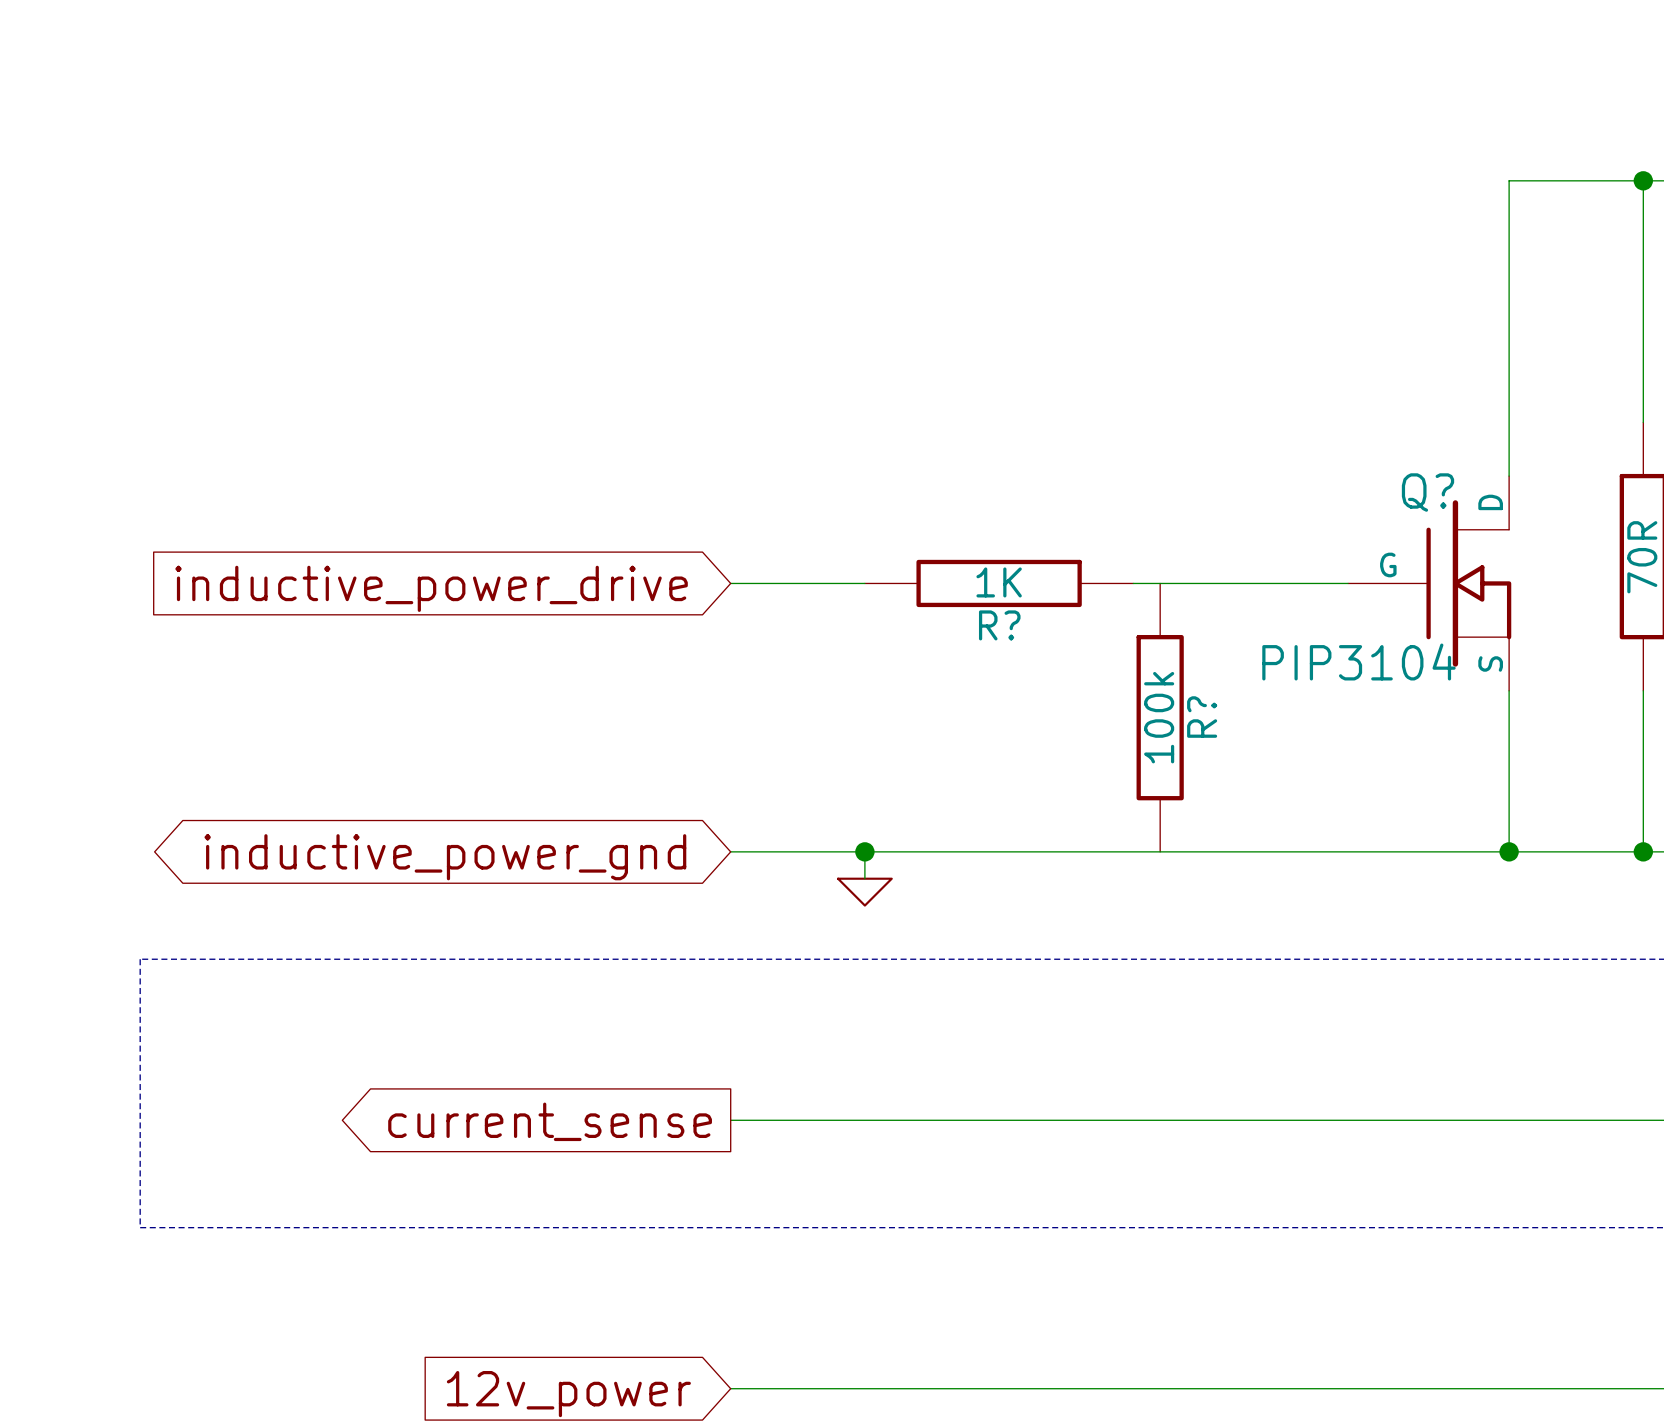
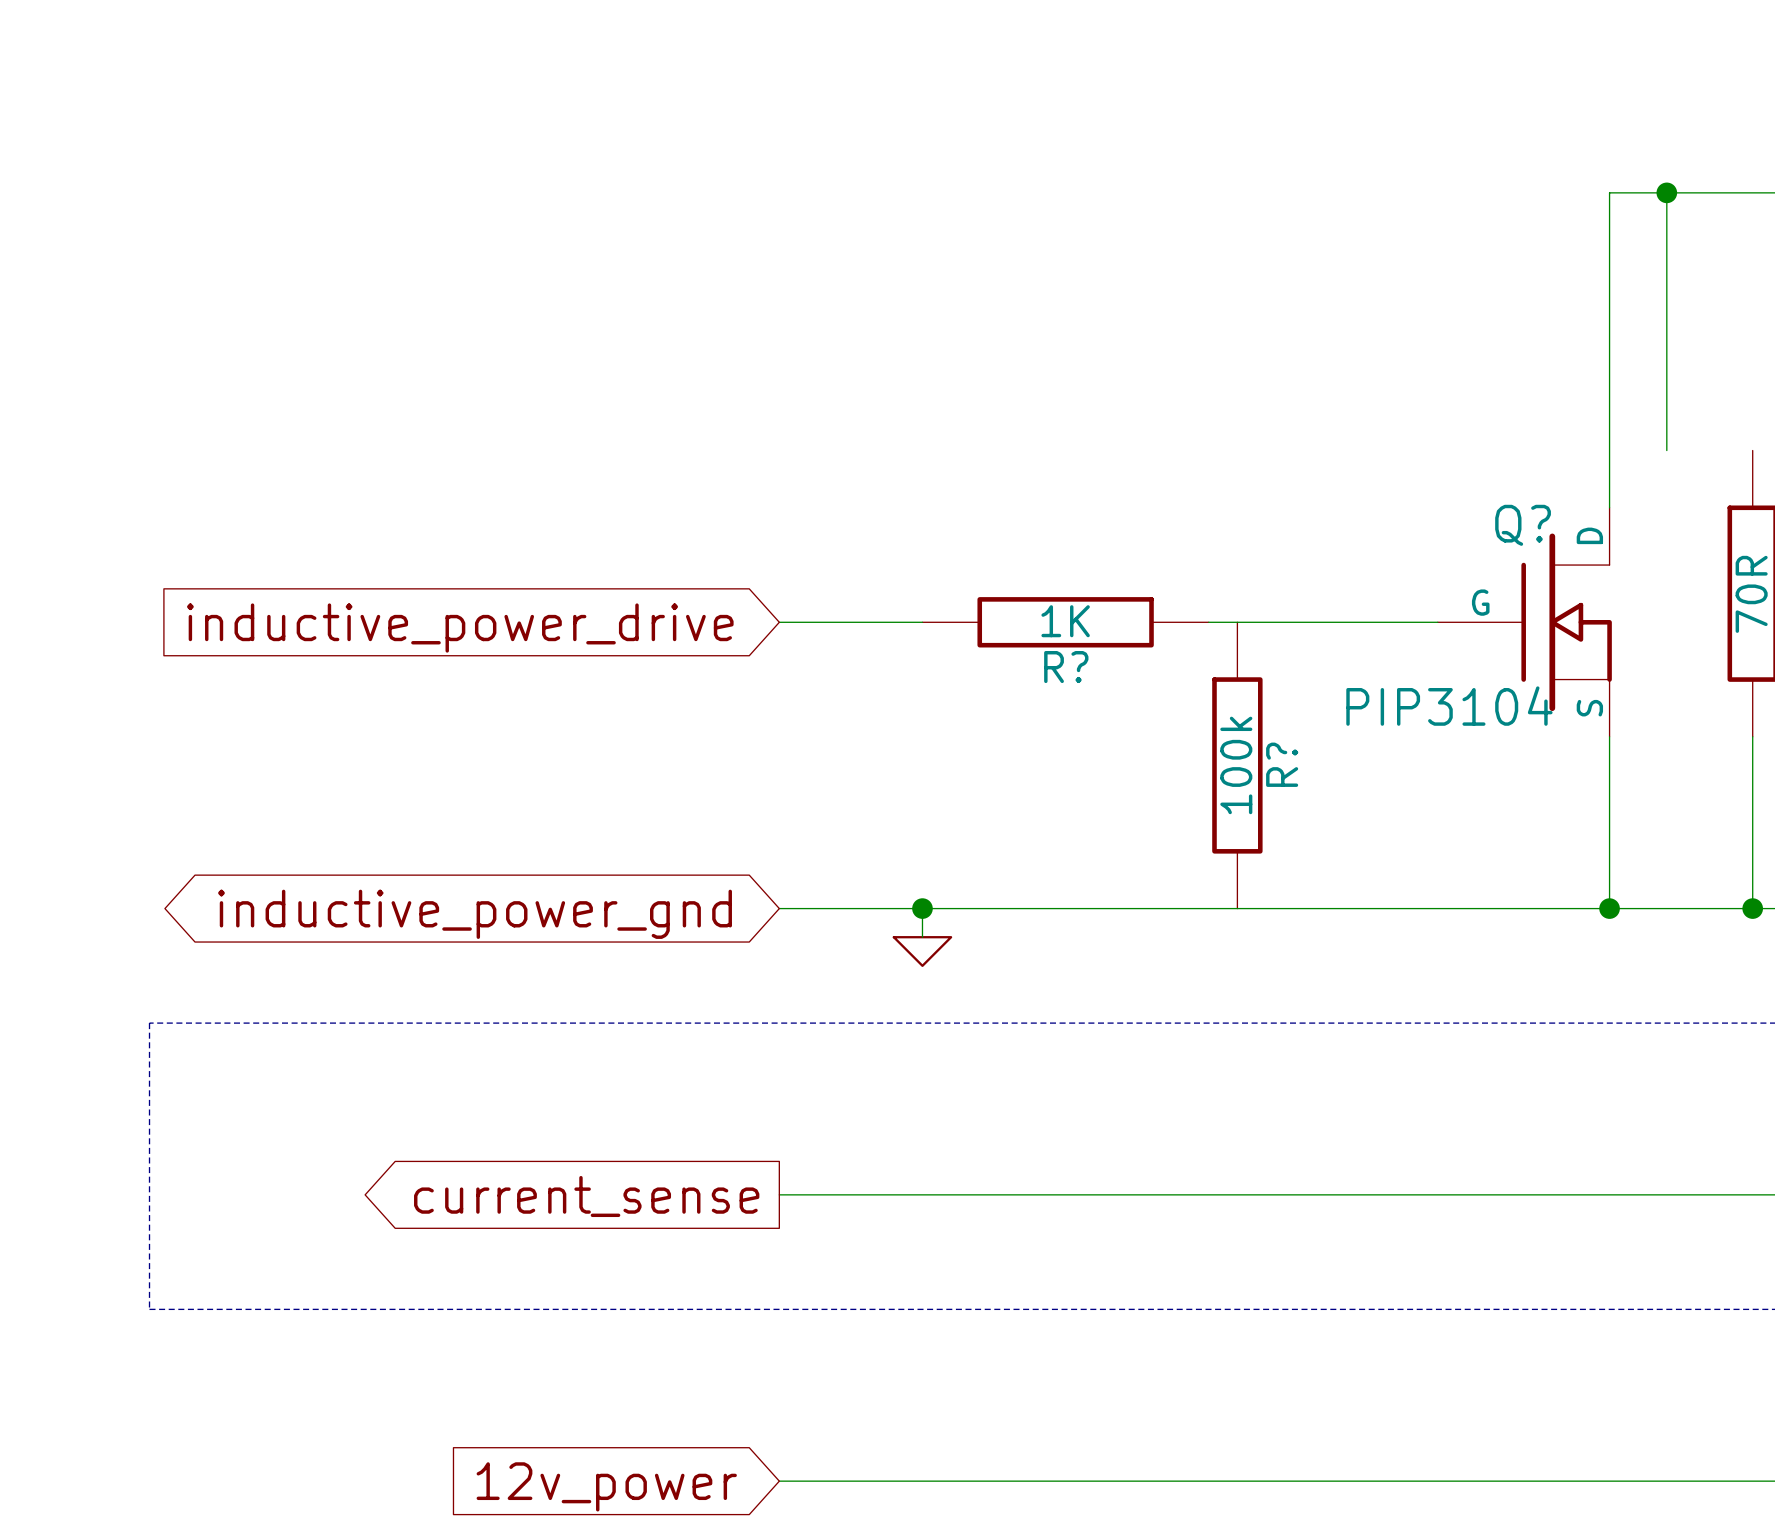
junction: none -> (1666, 192)
wire: (1643, 180) (1643, 422) -> (1666, 192) (1666, 450)
junction: (1643, 180) -> none

